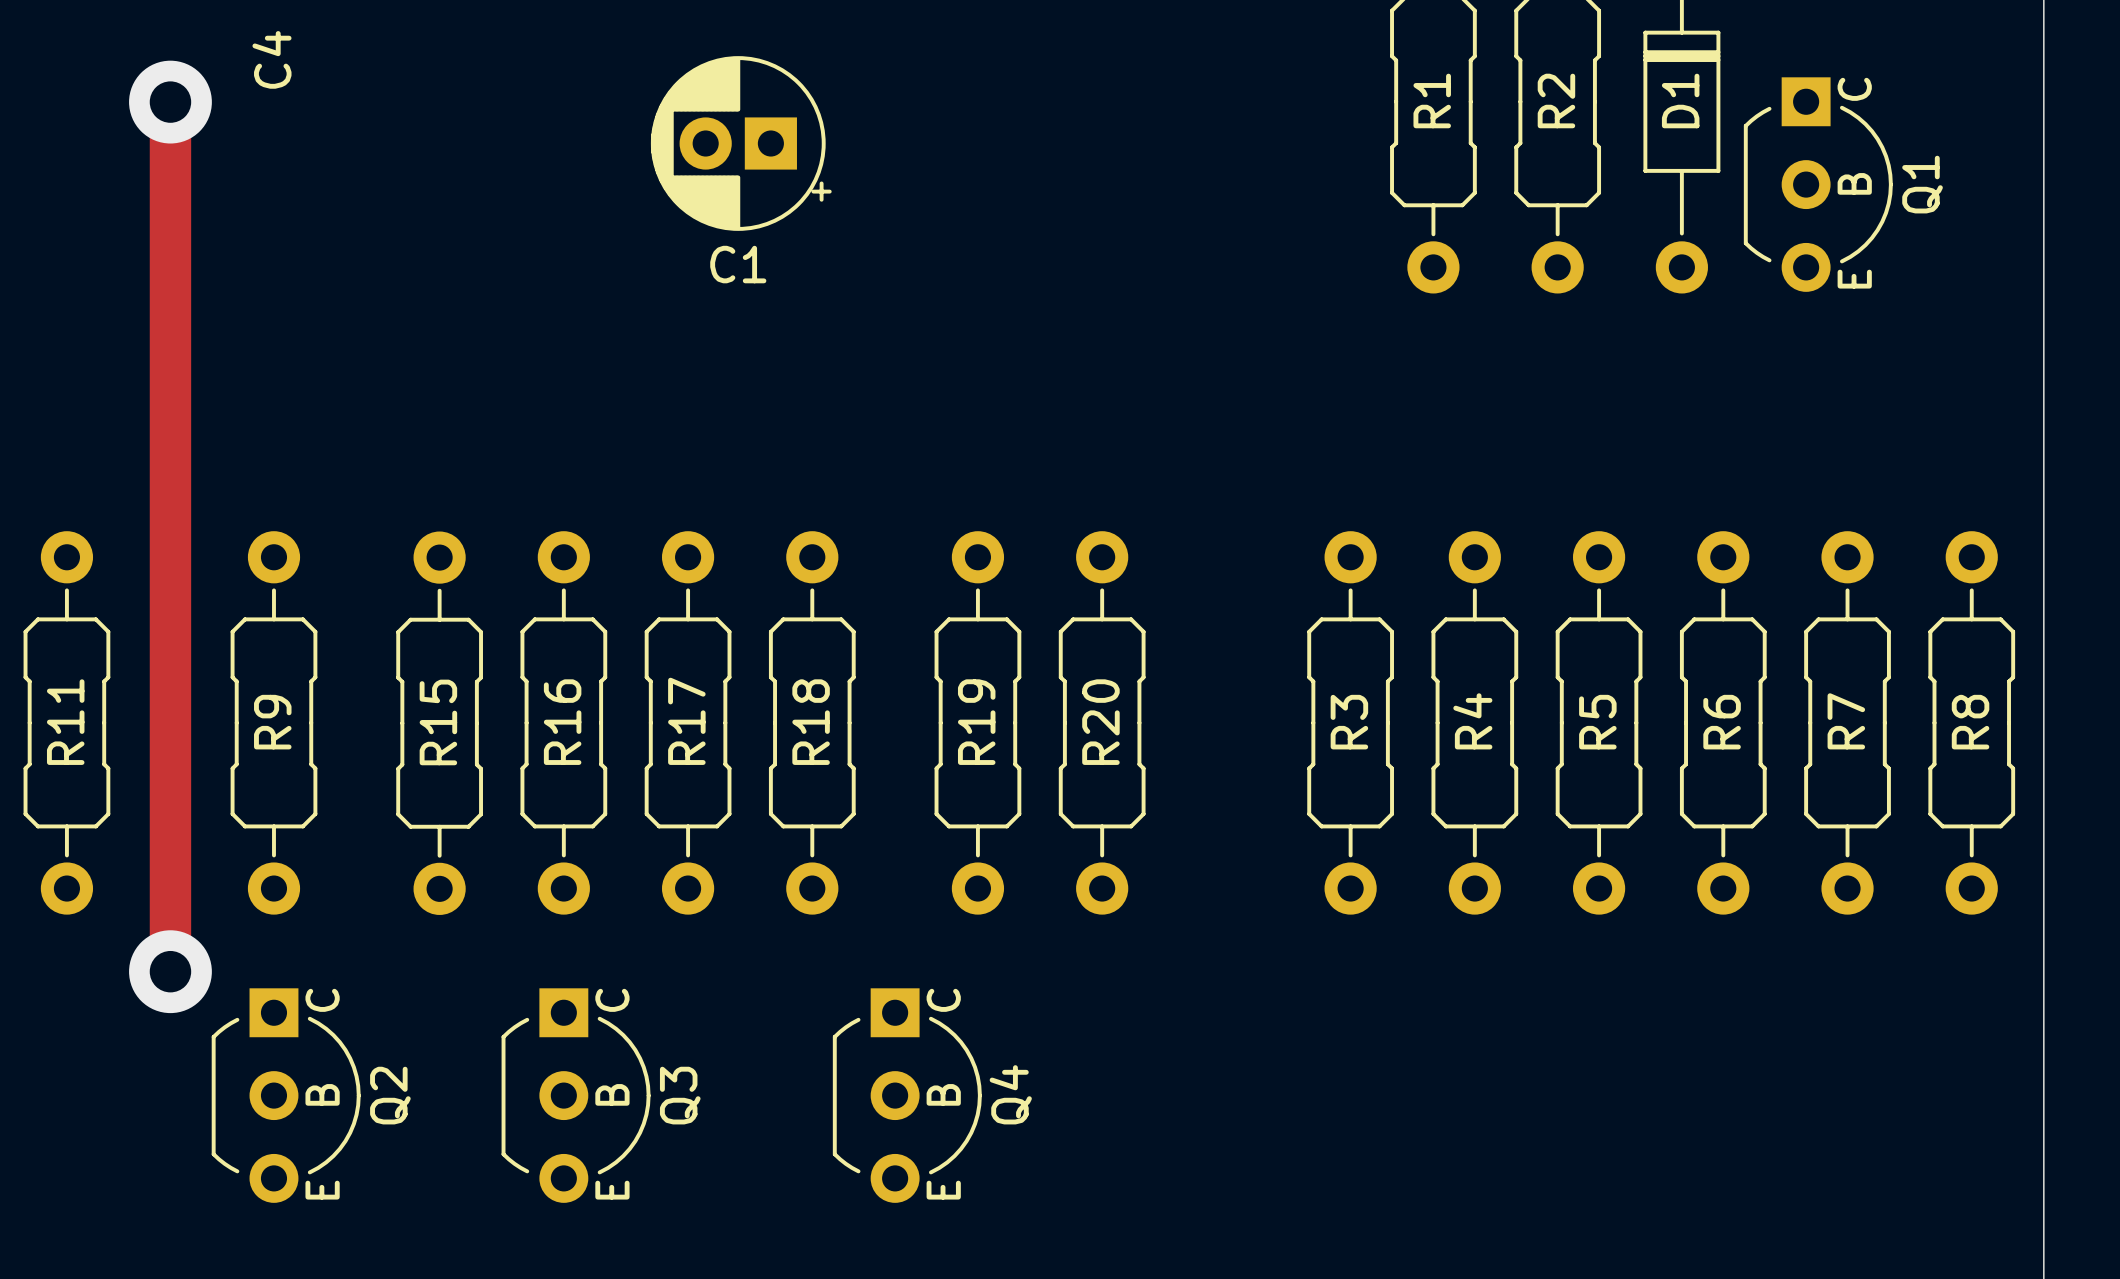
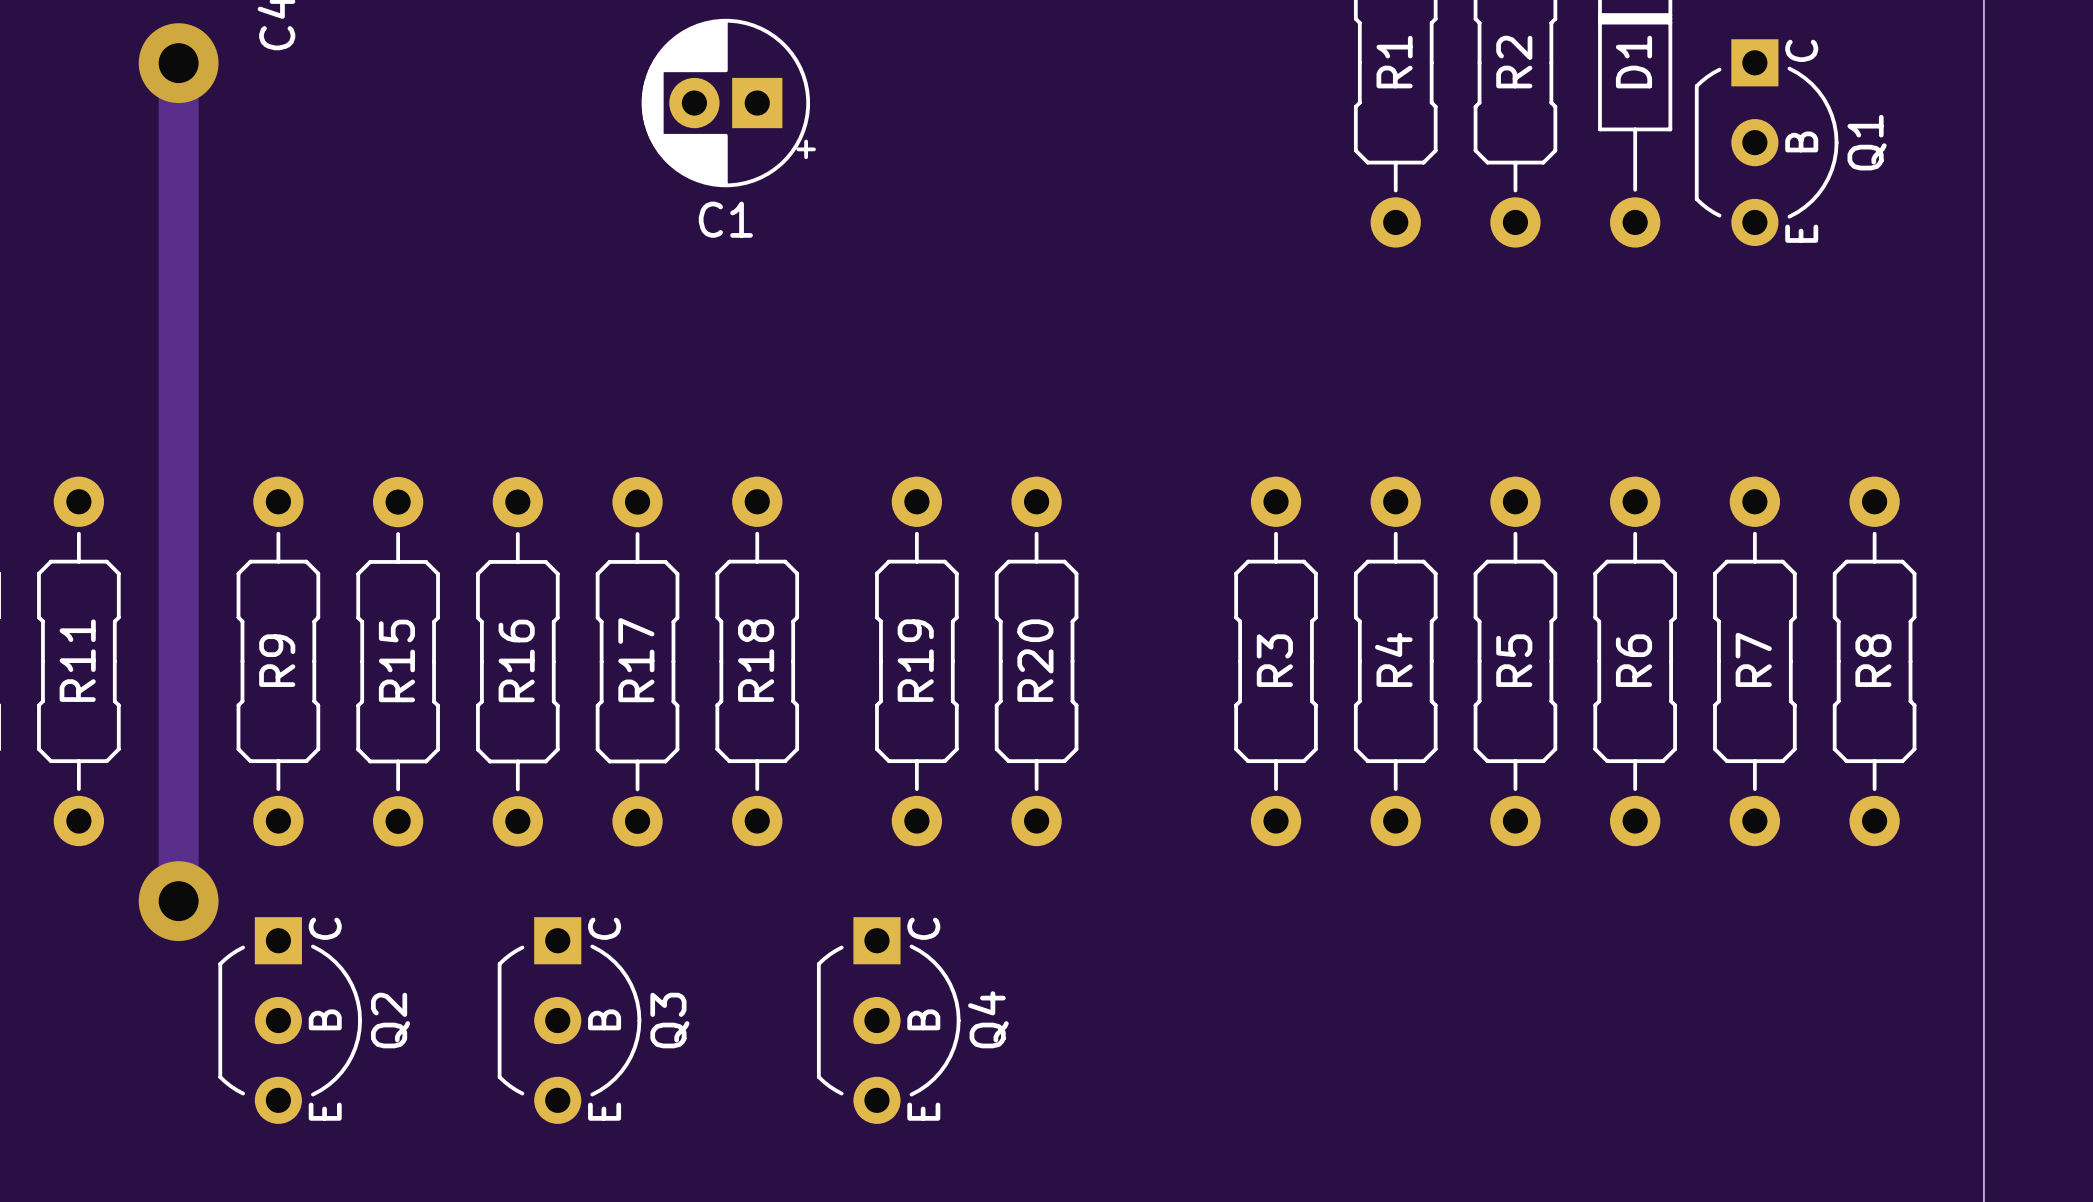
R16 position: (563, 722) -> (517, 661)
R17 position: (688, 722) -> (637, 661)
R18 position: (812, 722) -> (757, 661)
R19 position: (977, 722) -> (916, 661)
R20 position: (1102, 722) -> (1036, 661)
R3 position: (1350, 722) -> (1276, 661)
R4 position: (1474, 722) -> (1395, 661)
R5 position: (1599, 722) -> (1515, 661)
R6 position: (1723, 722) -> (1635, 661)
R7 position: (1847, 722) -> (1754, 661)
R8 position: (1971, 722) -> (1874, 661)
R15 position: (439, 723) -> (398, 661)

